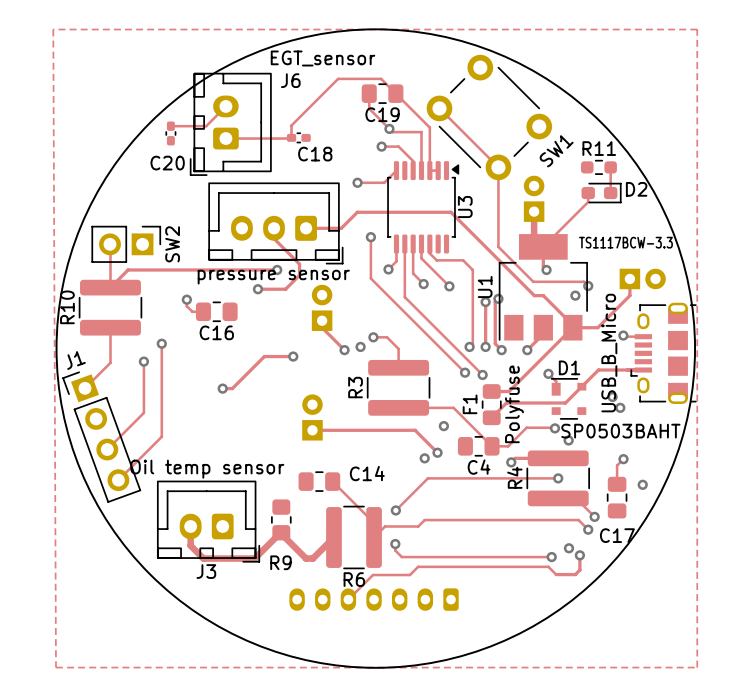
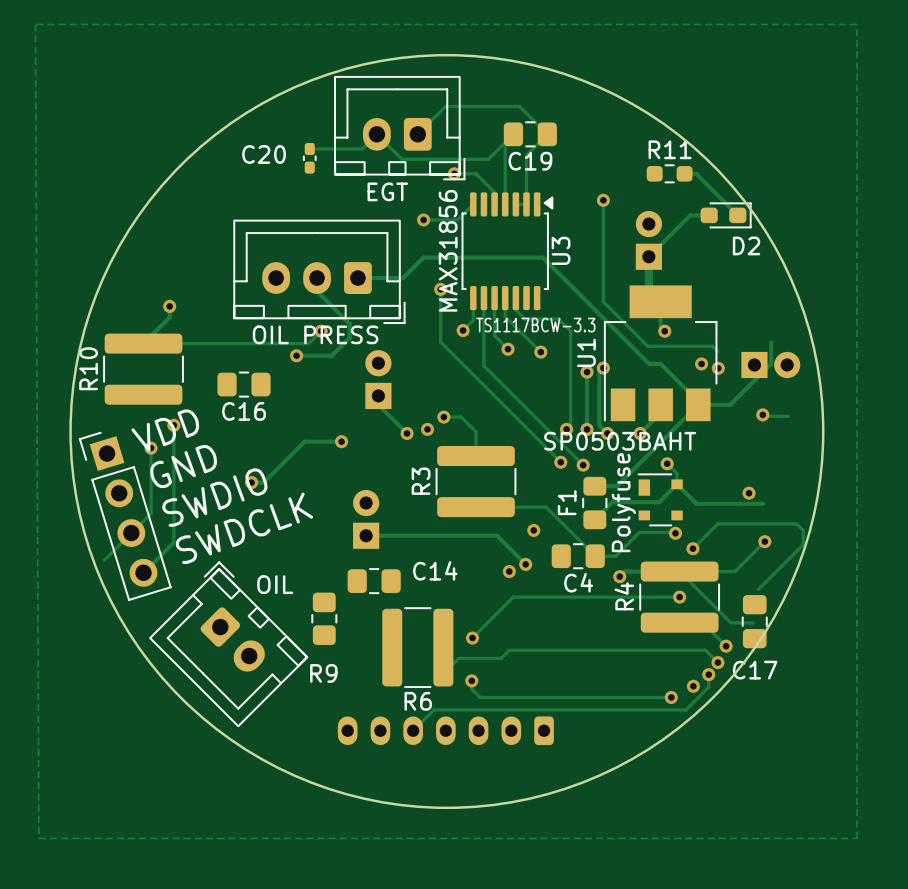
round board edge size: [55, 28, 697, 669] -> [69, 53, 825, 810]
track: (369, 93) (369, 108) (392, 132) (421, 132) -> (505, 142) (505, 155)
C19 position: (382, 93) -> (530, 134)
track: (225, 106) (206, 126) (170, 126) -> none
track: (439, 108) (498, 167) -> none
part: none -> EGT (399, 128)
track: none -> (417, 134) (445, 106) (519, 106) (547, 134) (526, 155) (526, 204)
track: none -> (513, 134) (488, 159) (401, 159) (376, 134) (362, 149) (309, 149)
SW1: (489, 117) -> none
J6: EGT_sensor (230, 124) -> none
via: (389, 128) -> none
C20 position: (170, 133) -> (309, 158)
C18: (298, 137) -> none
track: (225, 138) (290, 138) (291, 125) (338, 78) (381, 78) (429, 127) (429, 170) -> none
track: none -> (684, 173) (696, 173) (737, 215)
C20 name position: C20 (167, 163) -> C20 (264, 154)
via: none -> (603, 200)
R11 position: (598, 167) -> (669, 173)
track: (610, 167) (610, 193) -> none
track: none -> (709, 215) (690, 215) (648, 256)
D2 name position: D2 (636, 189) -> D2 (746, 245)
track: (588, 193) (588, 202) (543, 246) -> none
D2 position: (601, 193) -> (726, 215)
U3 value: none -> MAX31856 (448, 250)
U1 value position: TS1117BCW-3.3 (625, 242) -> TS1117BCW-3.3 (535, 325)
track: (109, 244) (110, 287) (128, 269) (277, 269) -> (169, 306) (169, 317) (143, 343) (308, 343) (321, 331)
SW2: (126, 244) -> none
part value: pressure sensor (273, 277) -> OIL PRESS (315, 334)
part position: (642, 278) -> (770, 365)
via position: (588, 286) -> (718, 368)
track: (186, 299) (186, 306) (192, 311) (203, 311) -> none
via position: (186, 299) -> (169, 306)
R10 position: (110, 307) -> (143, 369)
track: (110, 327) (110, 362) (85, 388) -> none
text: none -> VDD (165, 430)
part: USB_B_Micro (663, 353) -> none
track: (643, 370) (598, 370) (565, 403) (505, 403) -> (696, 503) (677, 484) (659, 502) (612, 502)
text: none -> GND (183, 466)
D1: SP0503BAHT (568, 398) -> none
text: none -> SWDIO (214, 497)
part: none -> SP0503BAHT (660, 499)
track: none -> (696, 503) (763, 503)
via: (620, 407) -> none
part: none -> (125, 516)
text: none -> SWDCLK (244, 528)
track: none -> (764, 541) (734, 571) (679, 571) (730, 622) (752, 622)
via: none -> (764, 541)
track: (161, 435) (118, 480) -> (173, 542) (143, 572)
J1: (101, 437) -> none
track: none -> (692, 548) (717, 523) (796, 523) (803, 530) (803, 544) (758, 589)
track: (623, 459) (617, 465) (617, 484) -> none
via: (623, 459) -> none
C14 position: (319, 481) -> (374, 581)
track: (332, 481) (374, 522) -> none
via: (642, 484) -> none
part: none -> OIL (228, 644)
R9 position: (281, 519) -> (324, 618)
J3: Oil temp sensor (208, 521) -> none
track: (190, 526) (190, 545) (203, 558) (254, 558) (280, 532) (306, 558) (312, 558) (333, 537) -> none
R6 position: (354, 537) -> (417, 647)
track: (579, 555) (579, 570) (575, 574) (556, 574) (548, 566) -> (708, 674) (708, 687) (685, 709) (667, 709)
via position: (579, 555) -> (708, 674)
track: (418, 566) (409, 575) (372, 575) (348, 599) -> (500, 709) (433, 709) (413, 730)
part position: (374, 599) -> (445, 730)

